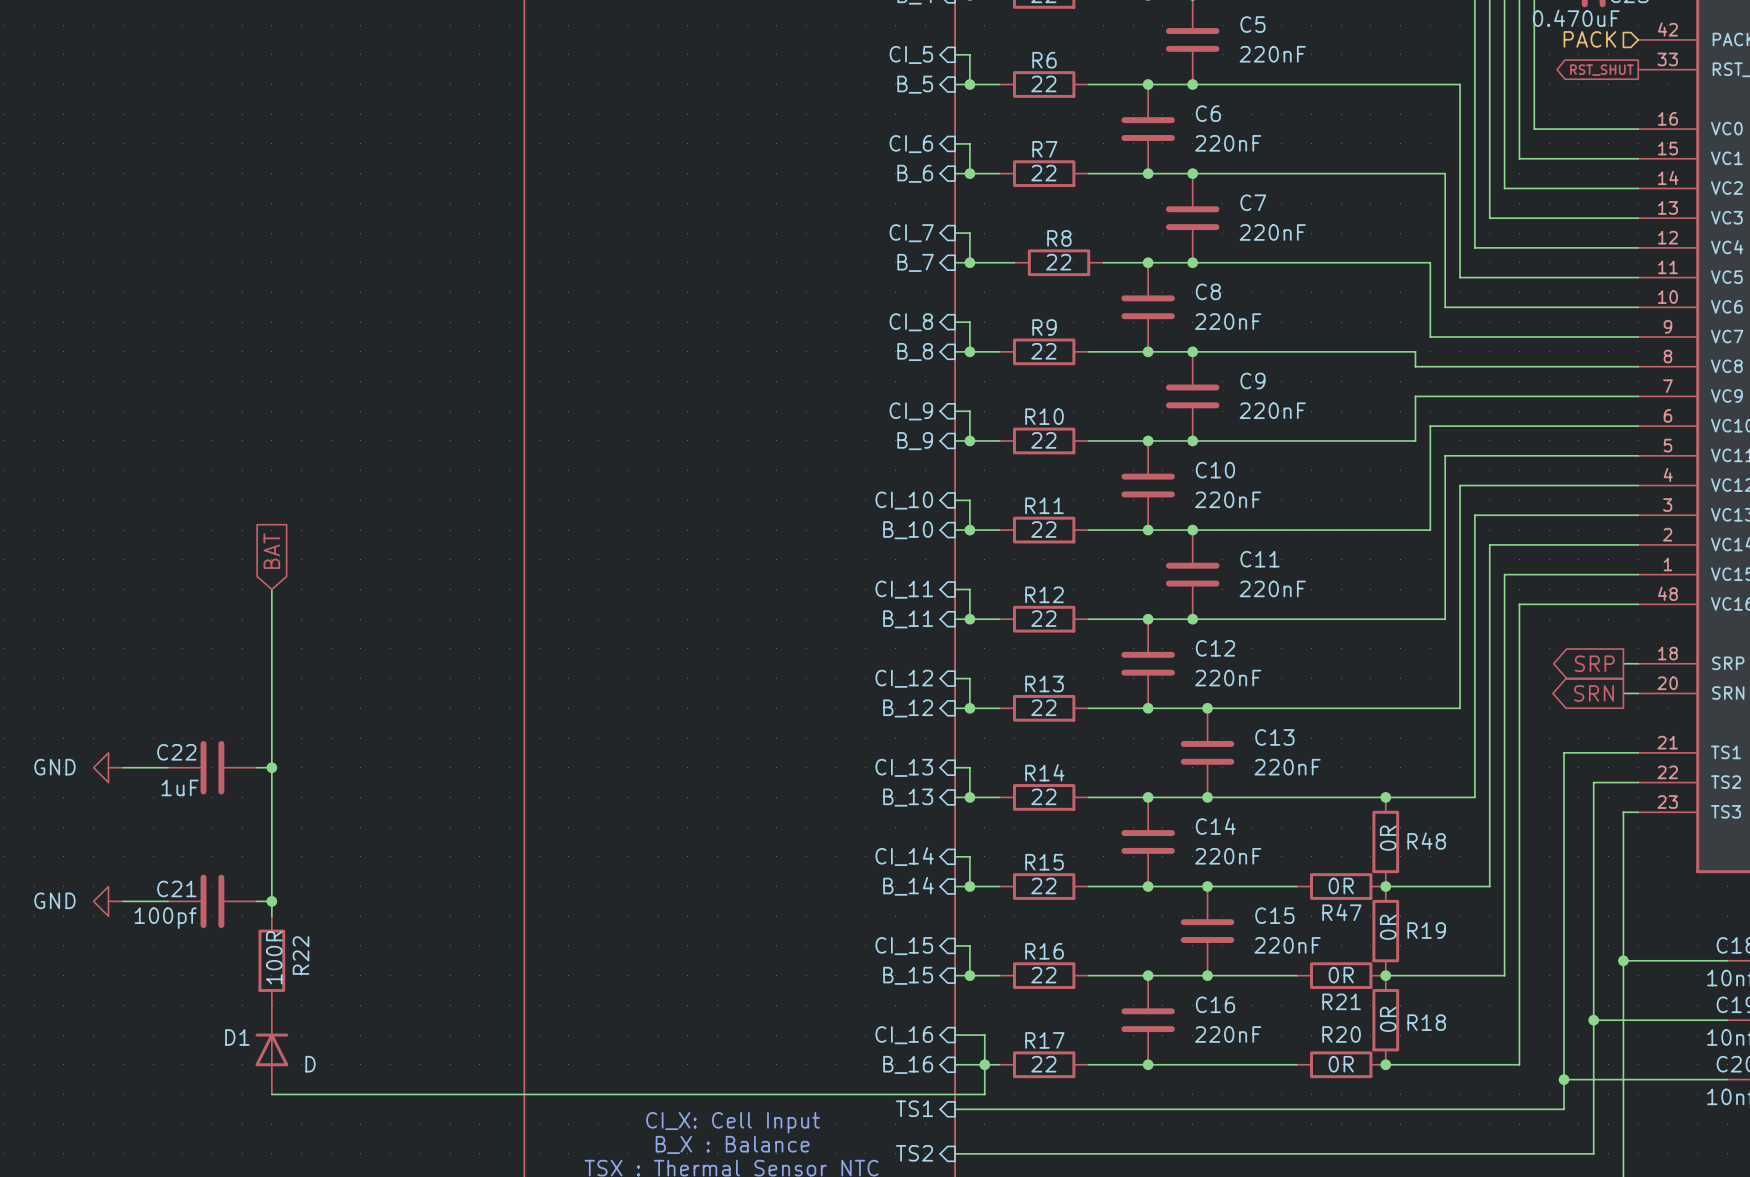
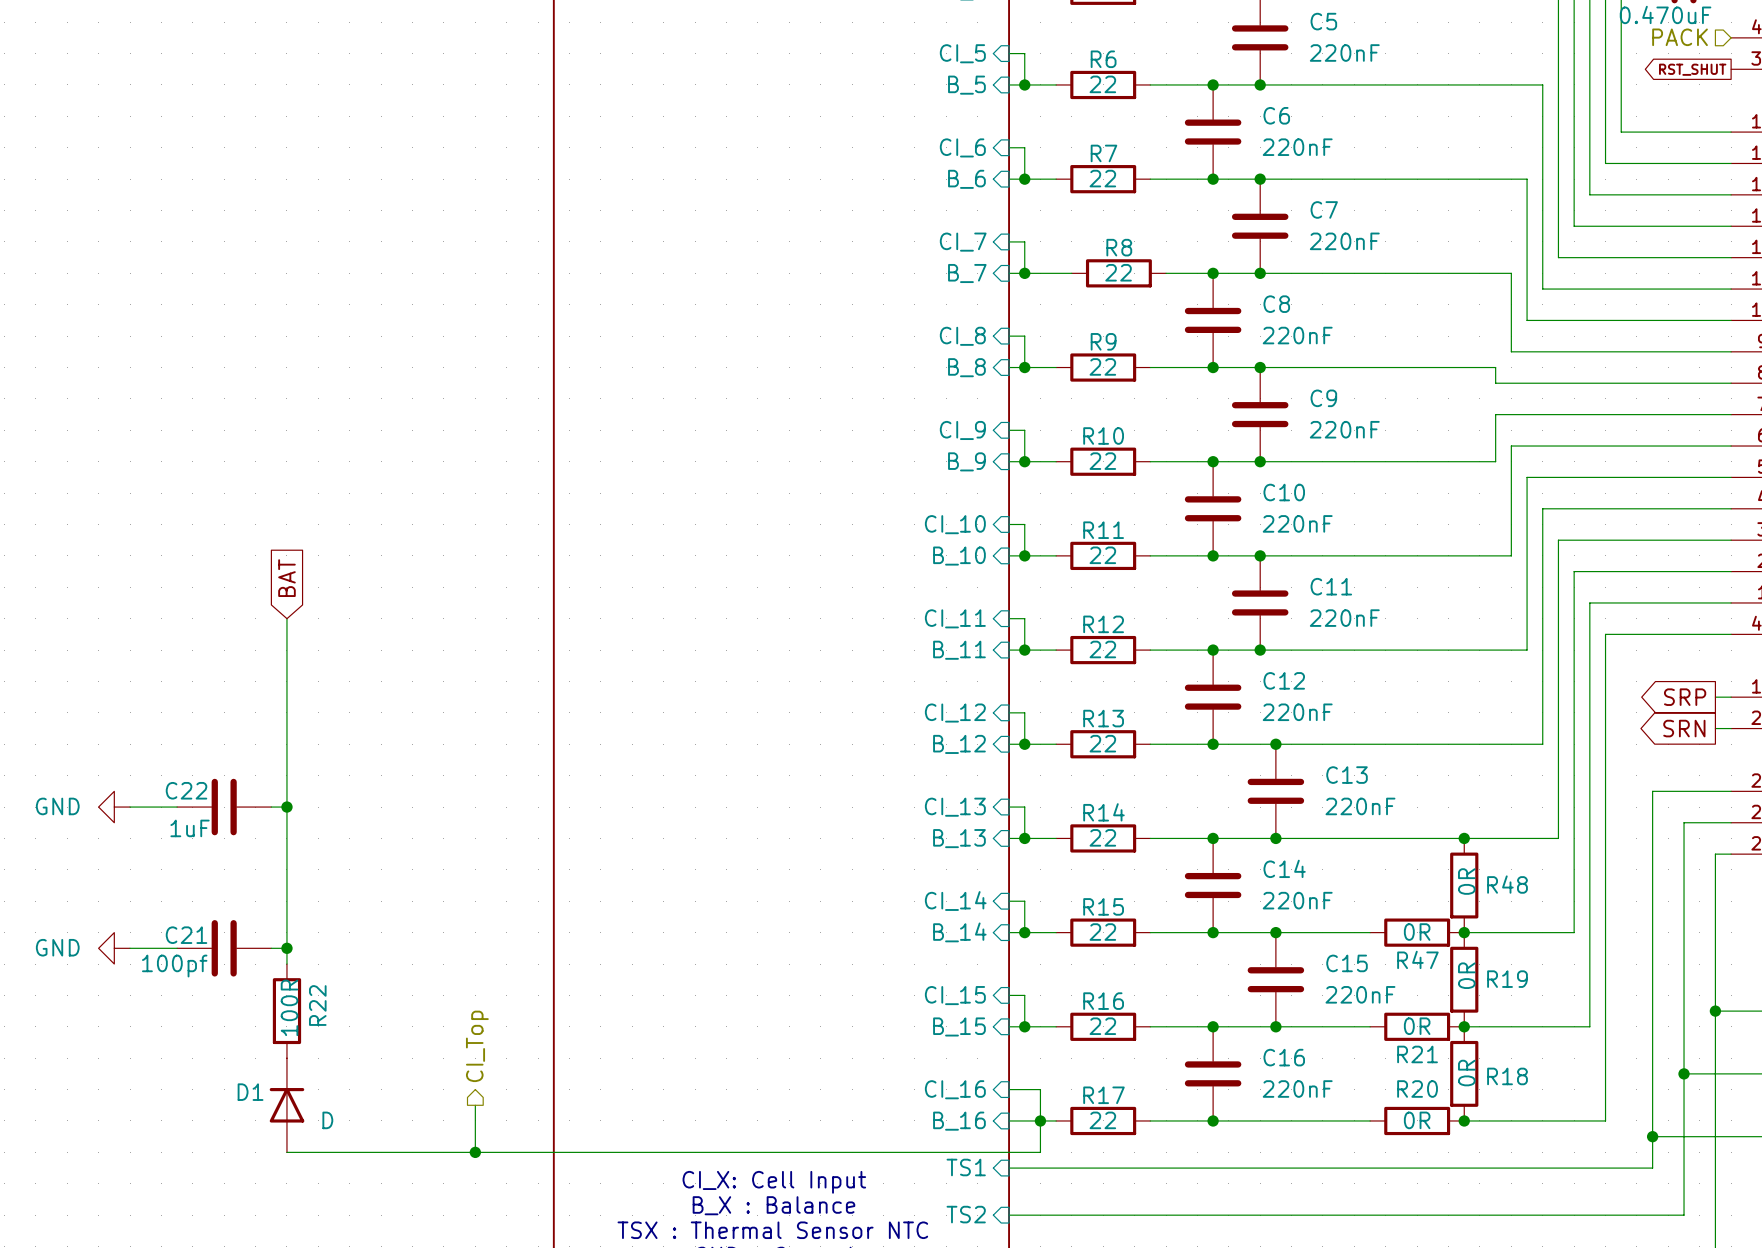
hierarchical label: none -> CI_Top (477, 1046)
wire: none -> (475, 1105) (475, 1152)
junction: none -> (475, 1152)

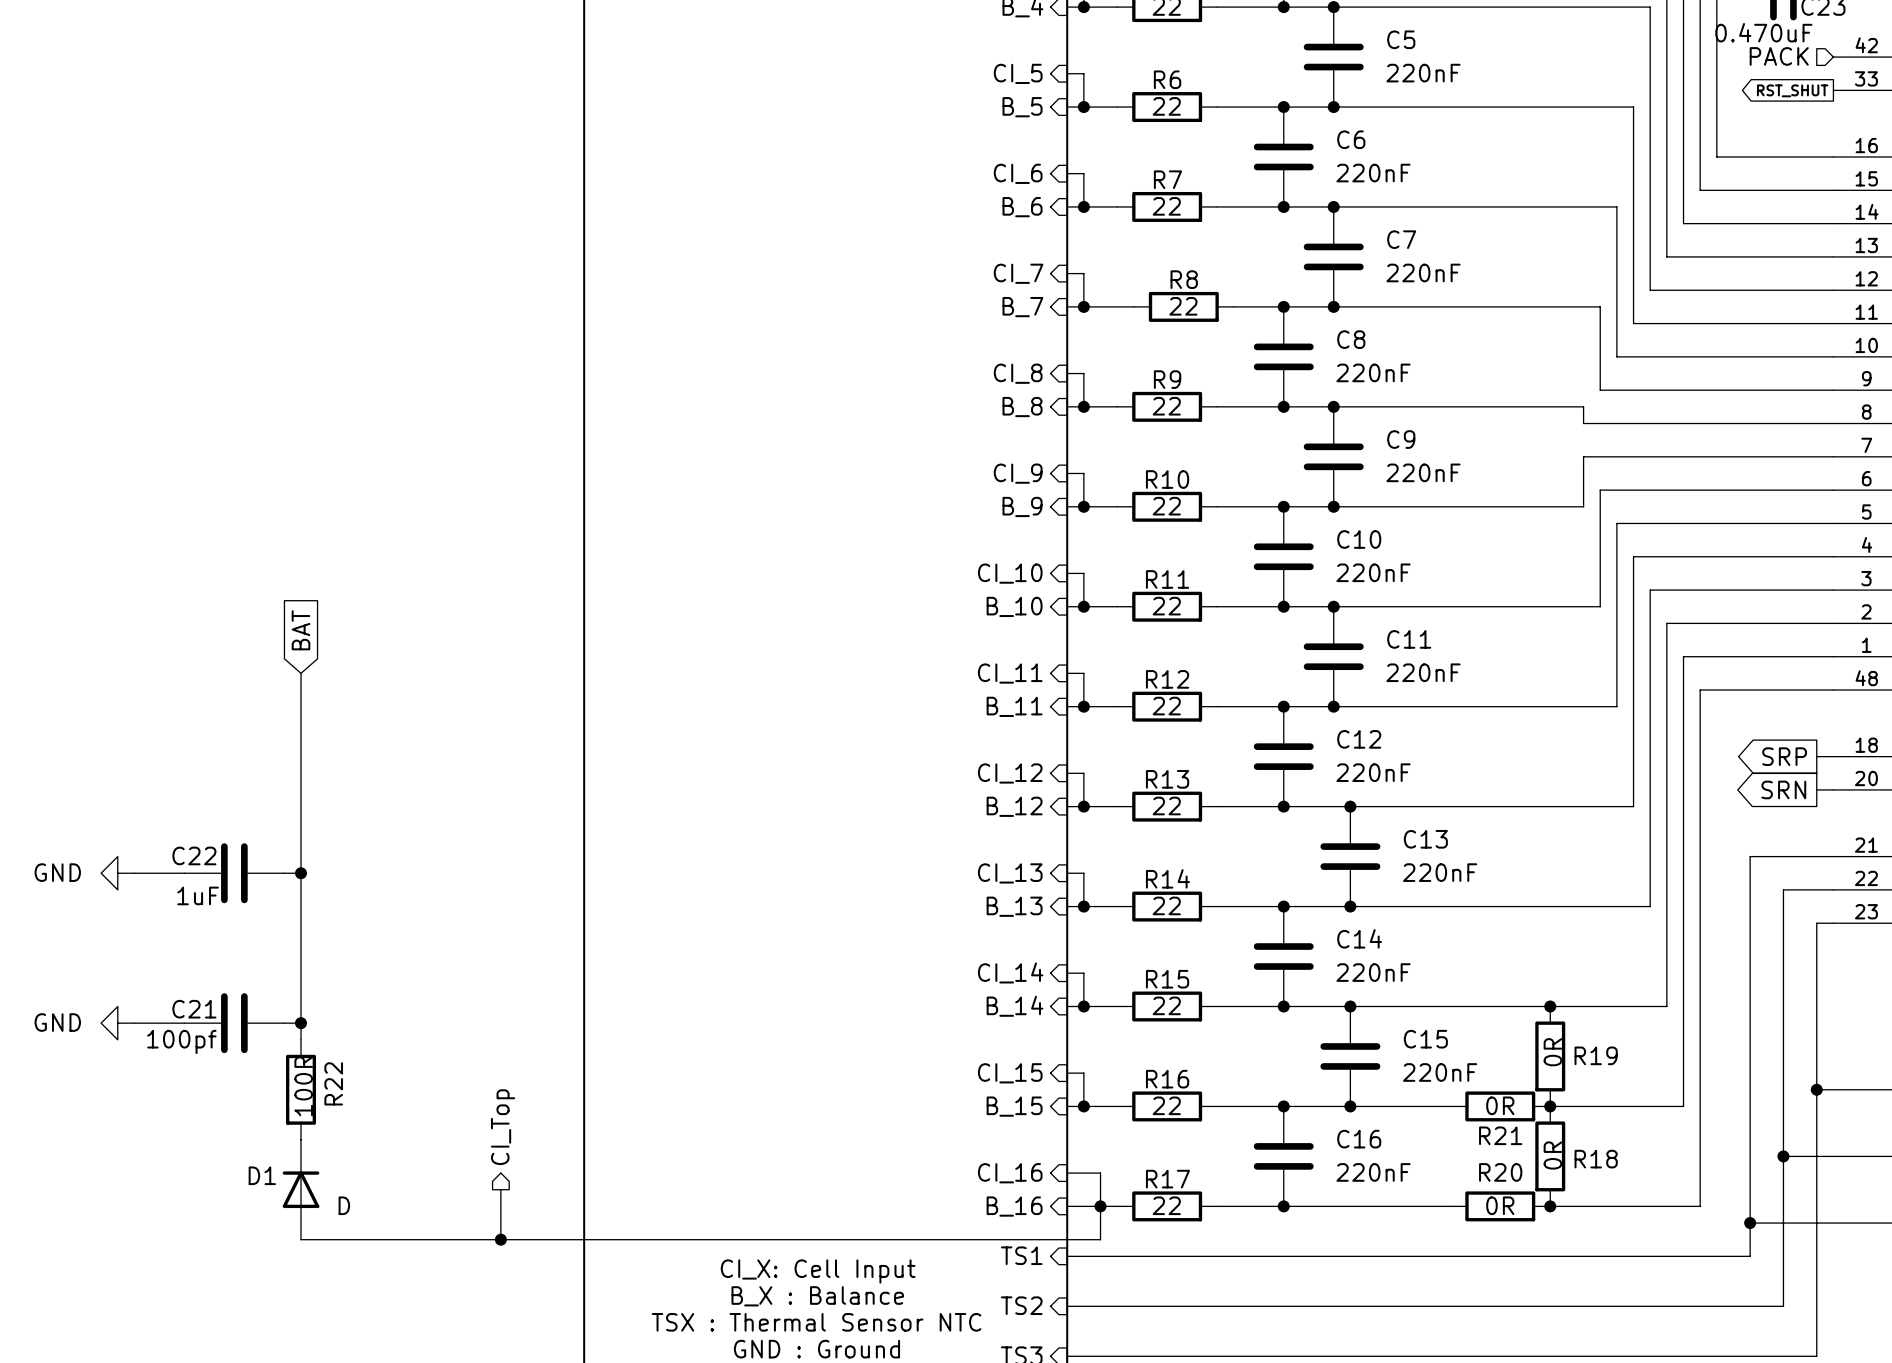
junction: (1464, 838) -> none
R48: 0R (1464, 885) -> none
wire: none -> (1450, 1006) (1550, 1006)
R47: 0R (1417, 932) -> none

